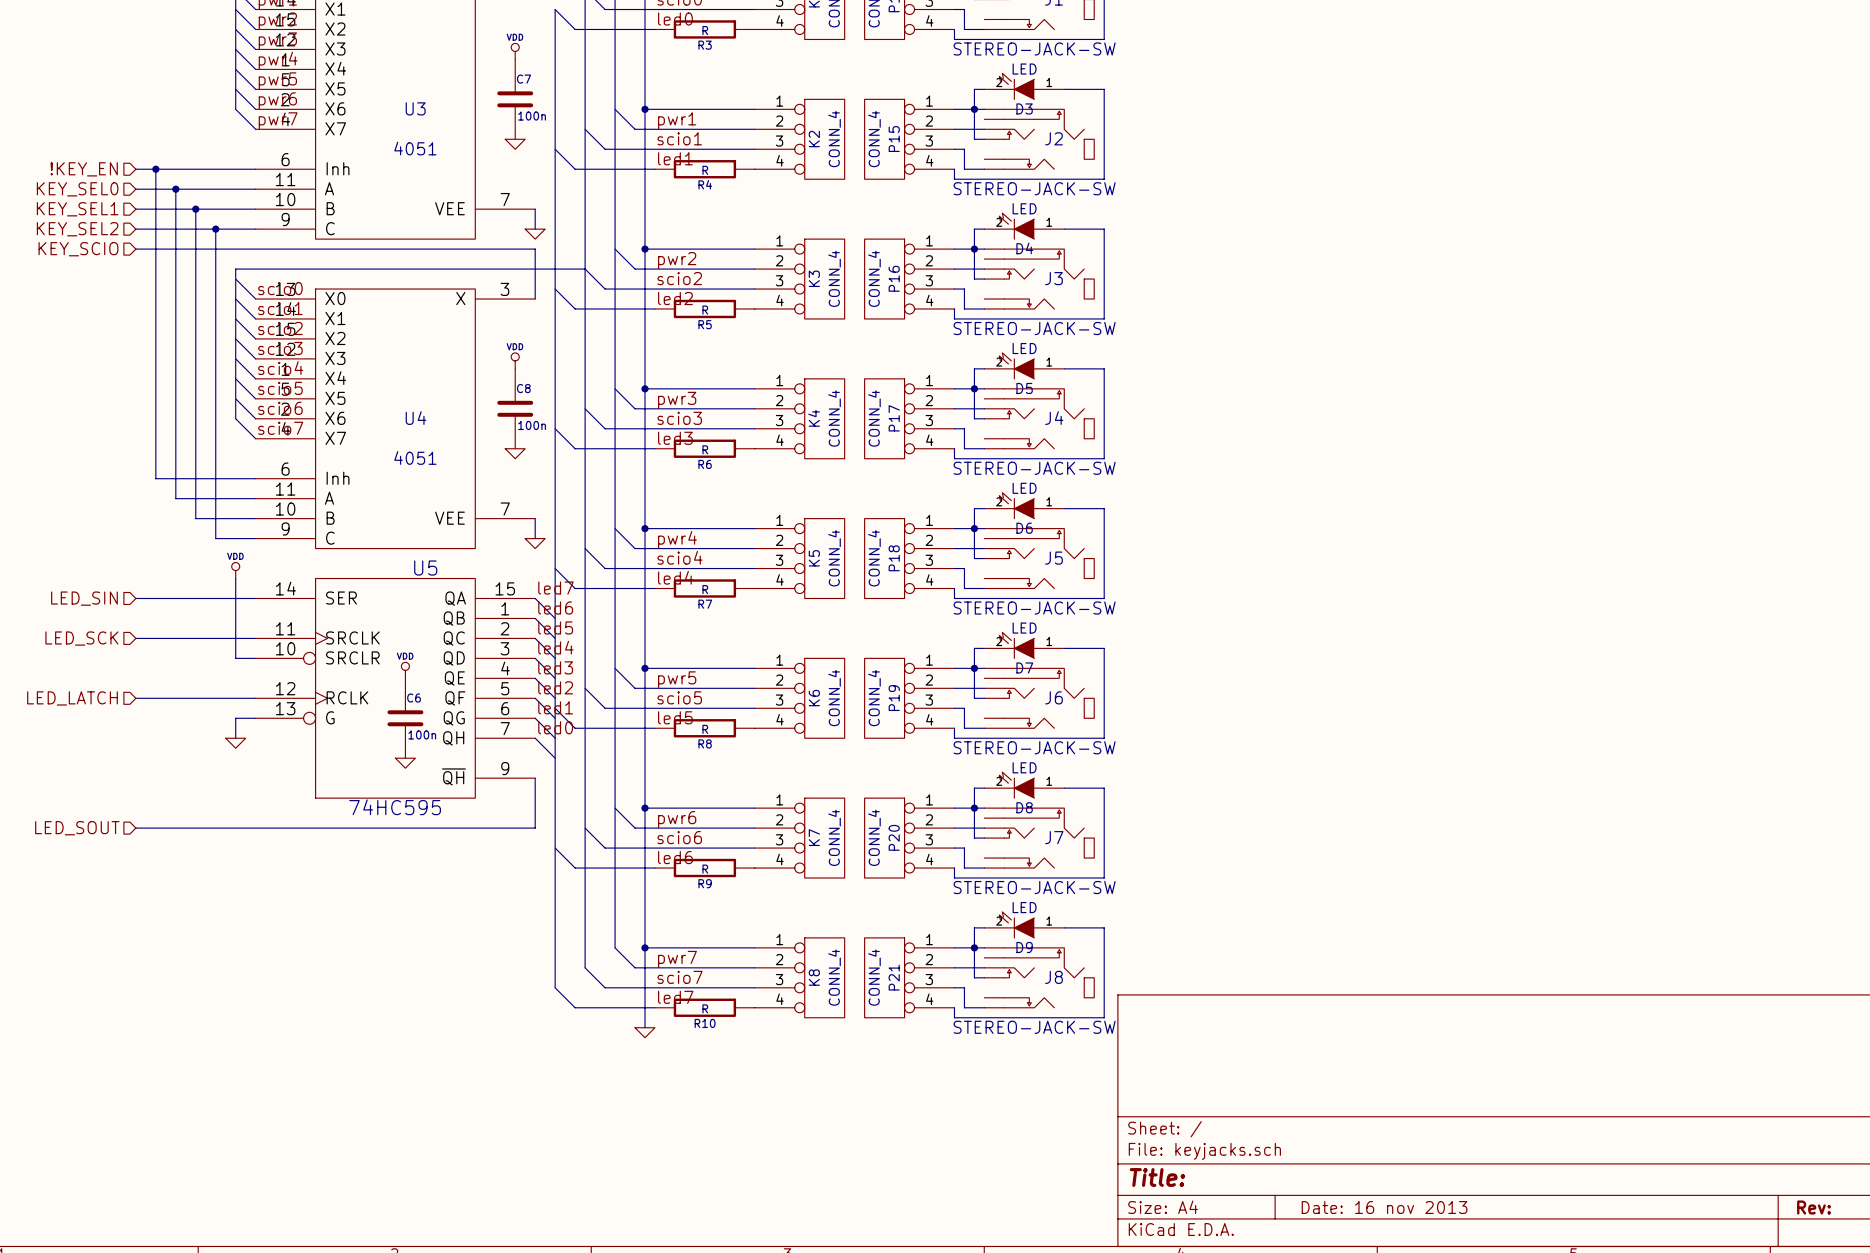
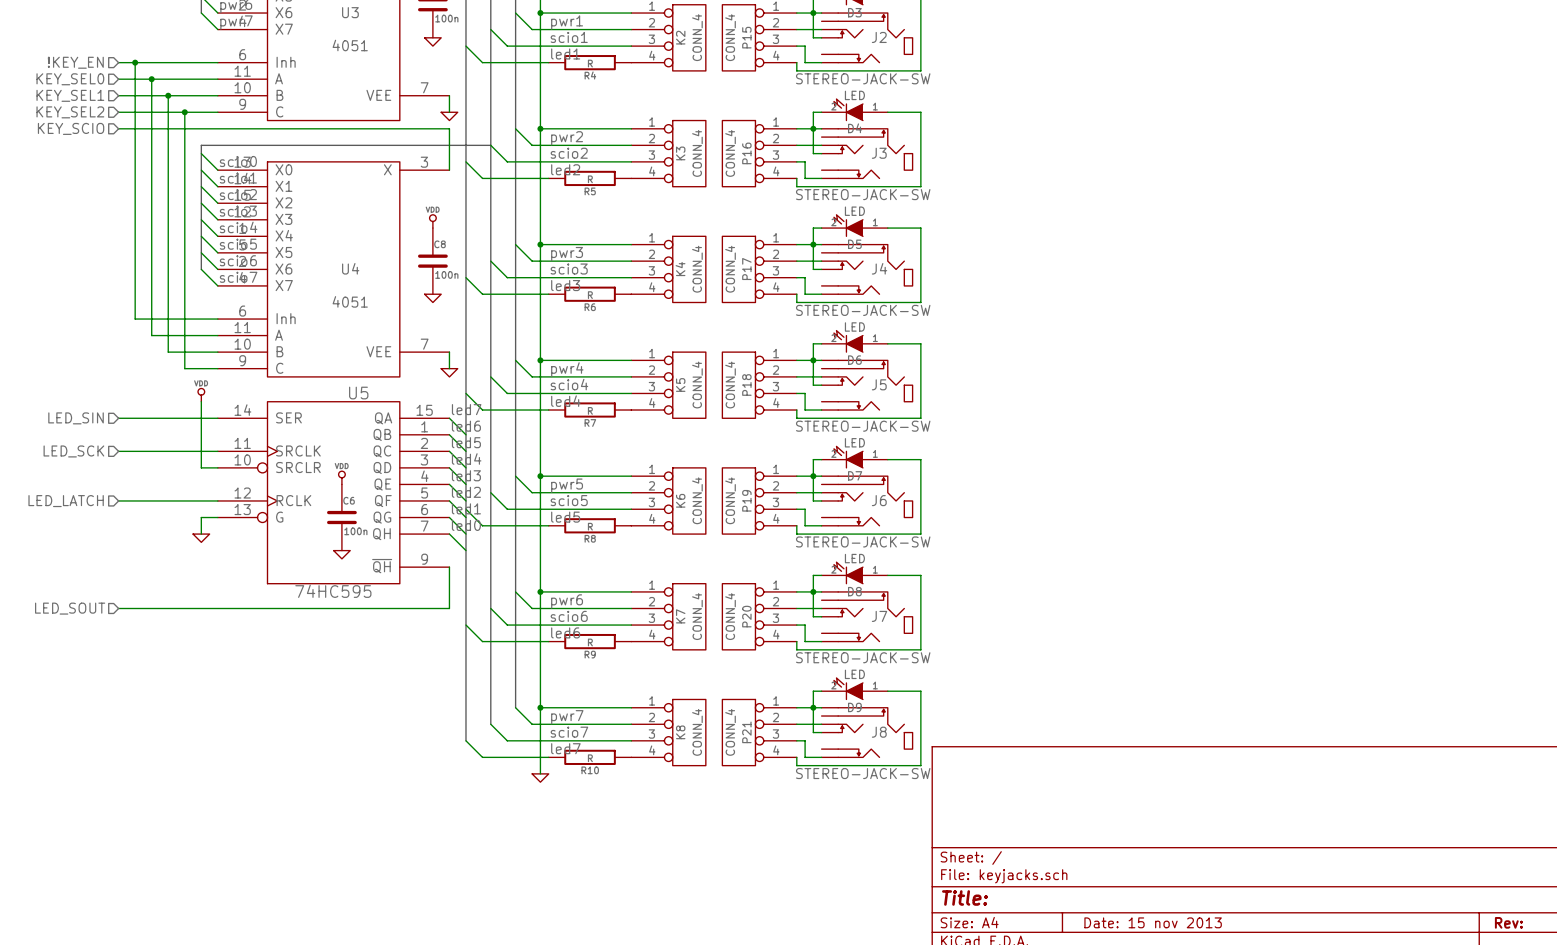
title block: Date: 16 nov 2013 (1384, 1207) -> Date: 15 nov 2013 (1153, 922)

